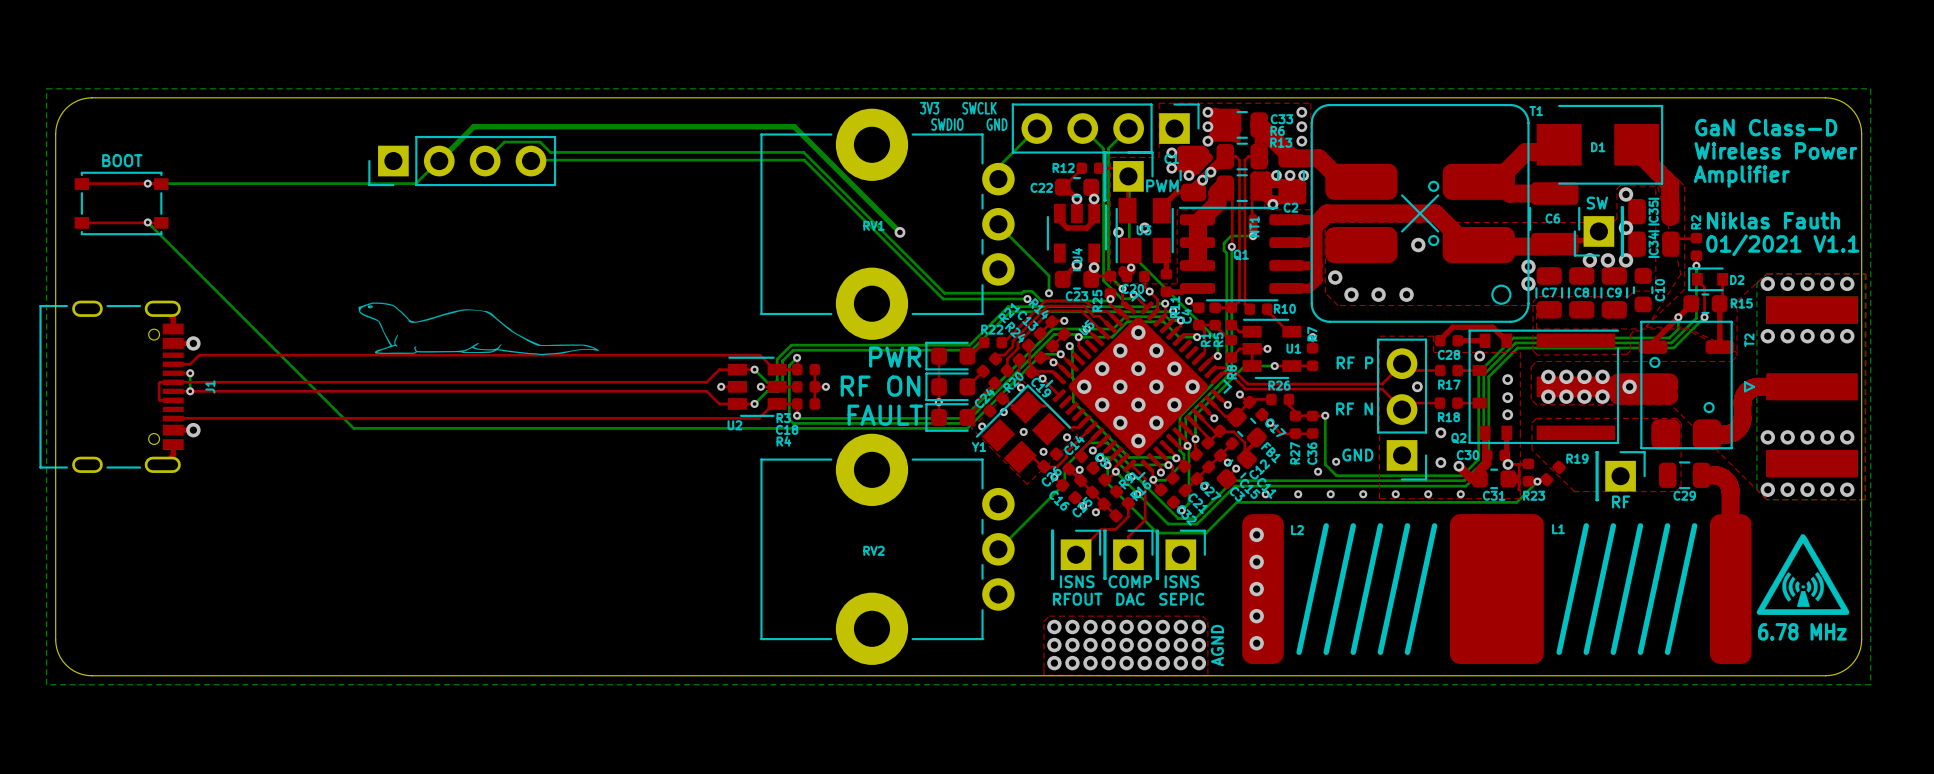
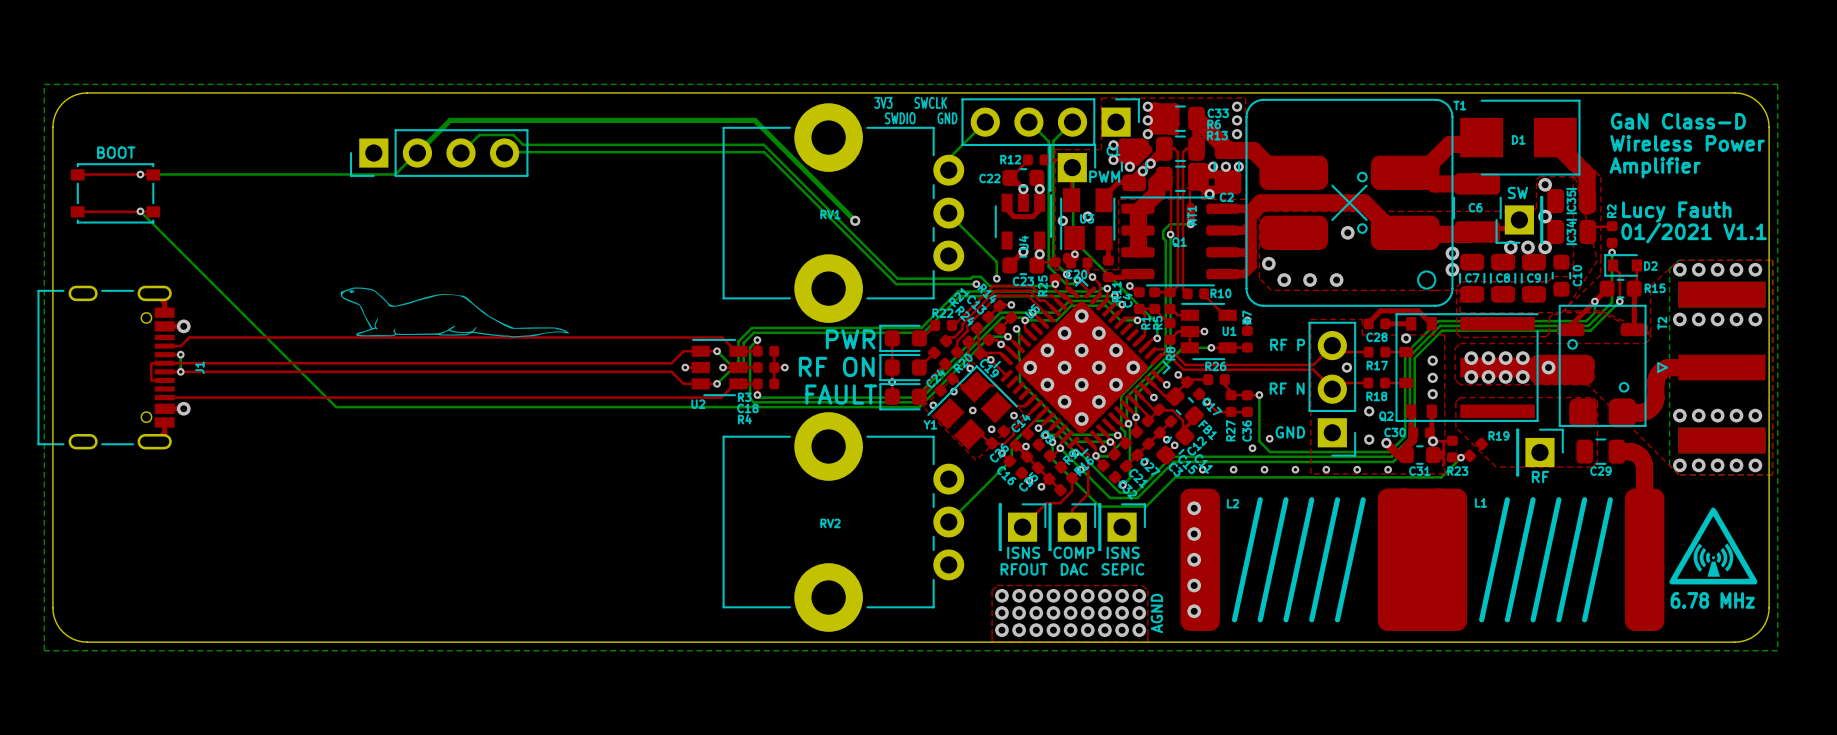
text: Niklas Fauth (1773, 220) -> Lucy Fauth (1676, 211)

